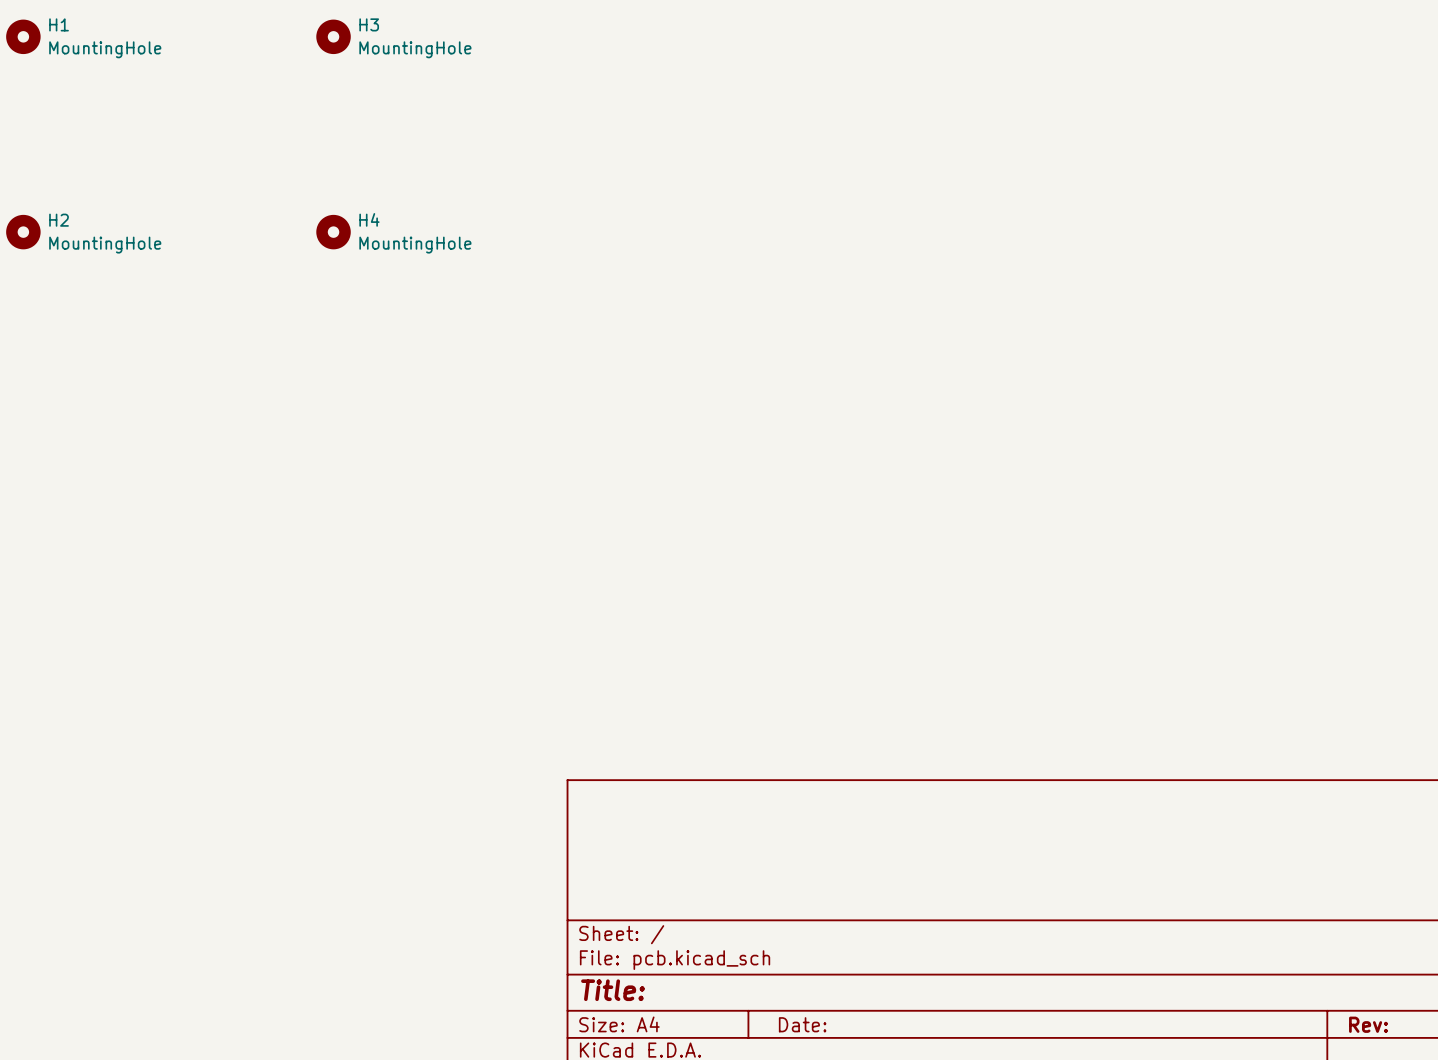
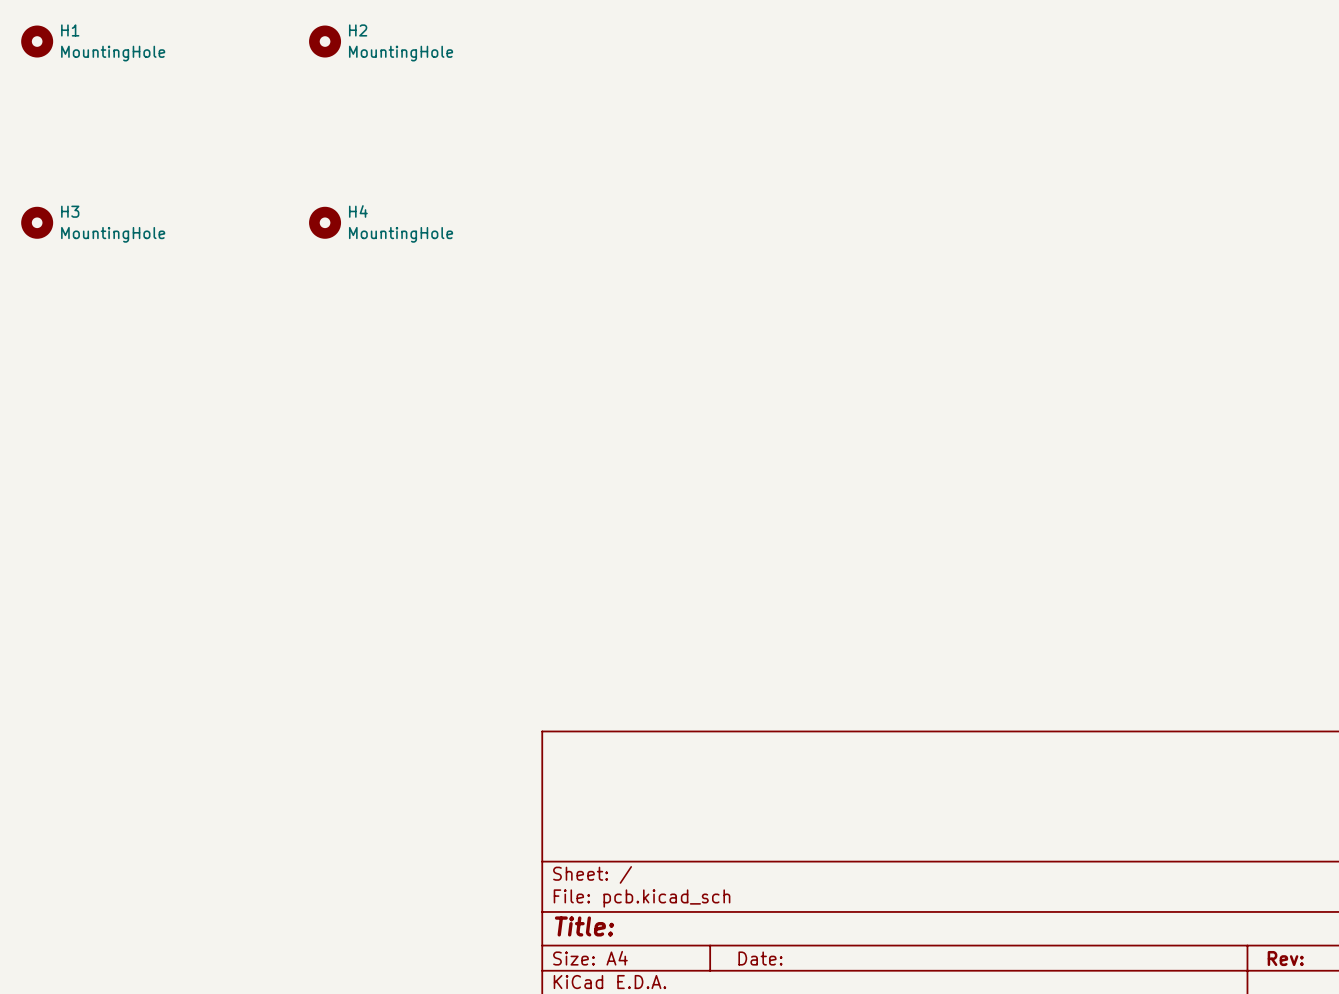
H3 name: H3 (369, 24) -> H2 (358, 30)
H2 name: H2 (59, 220) -> H3 (70, 211)

